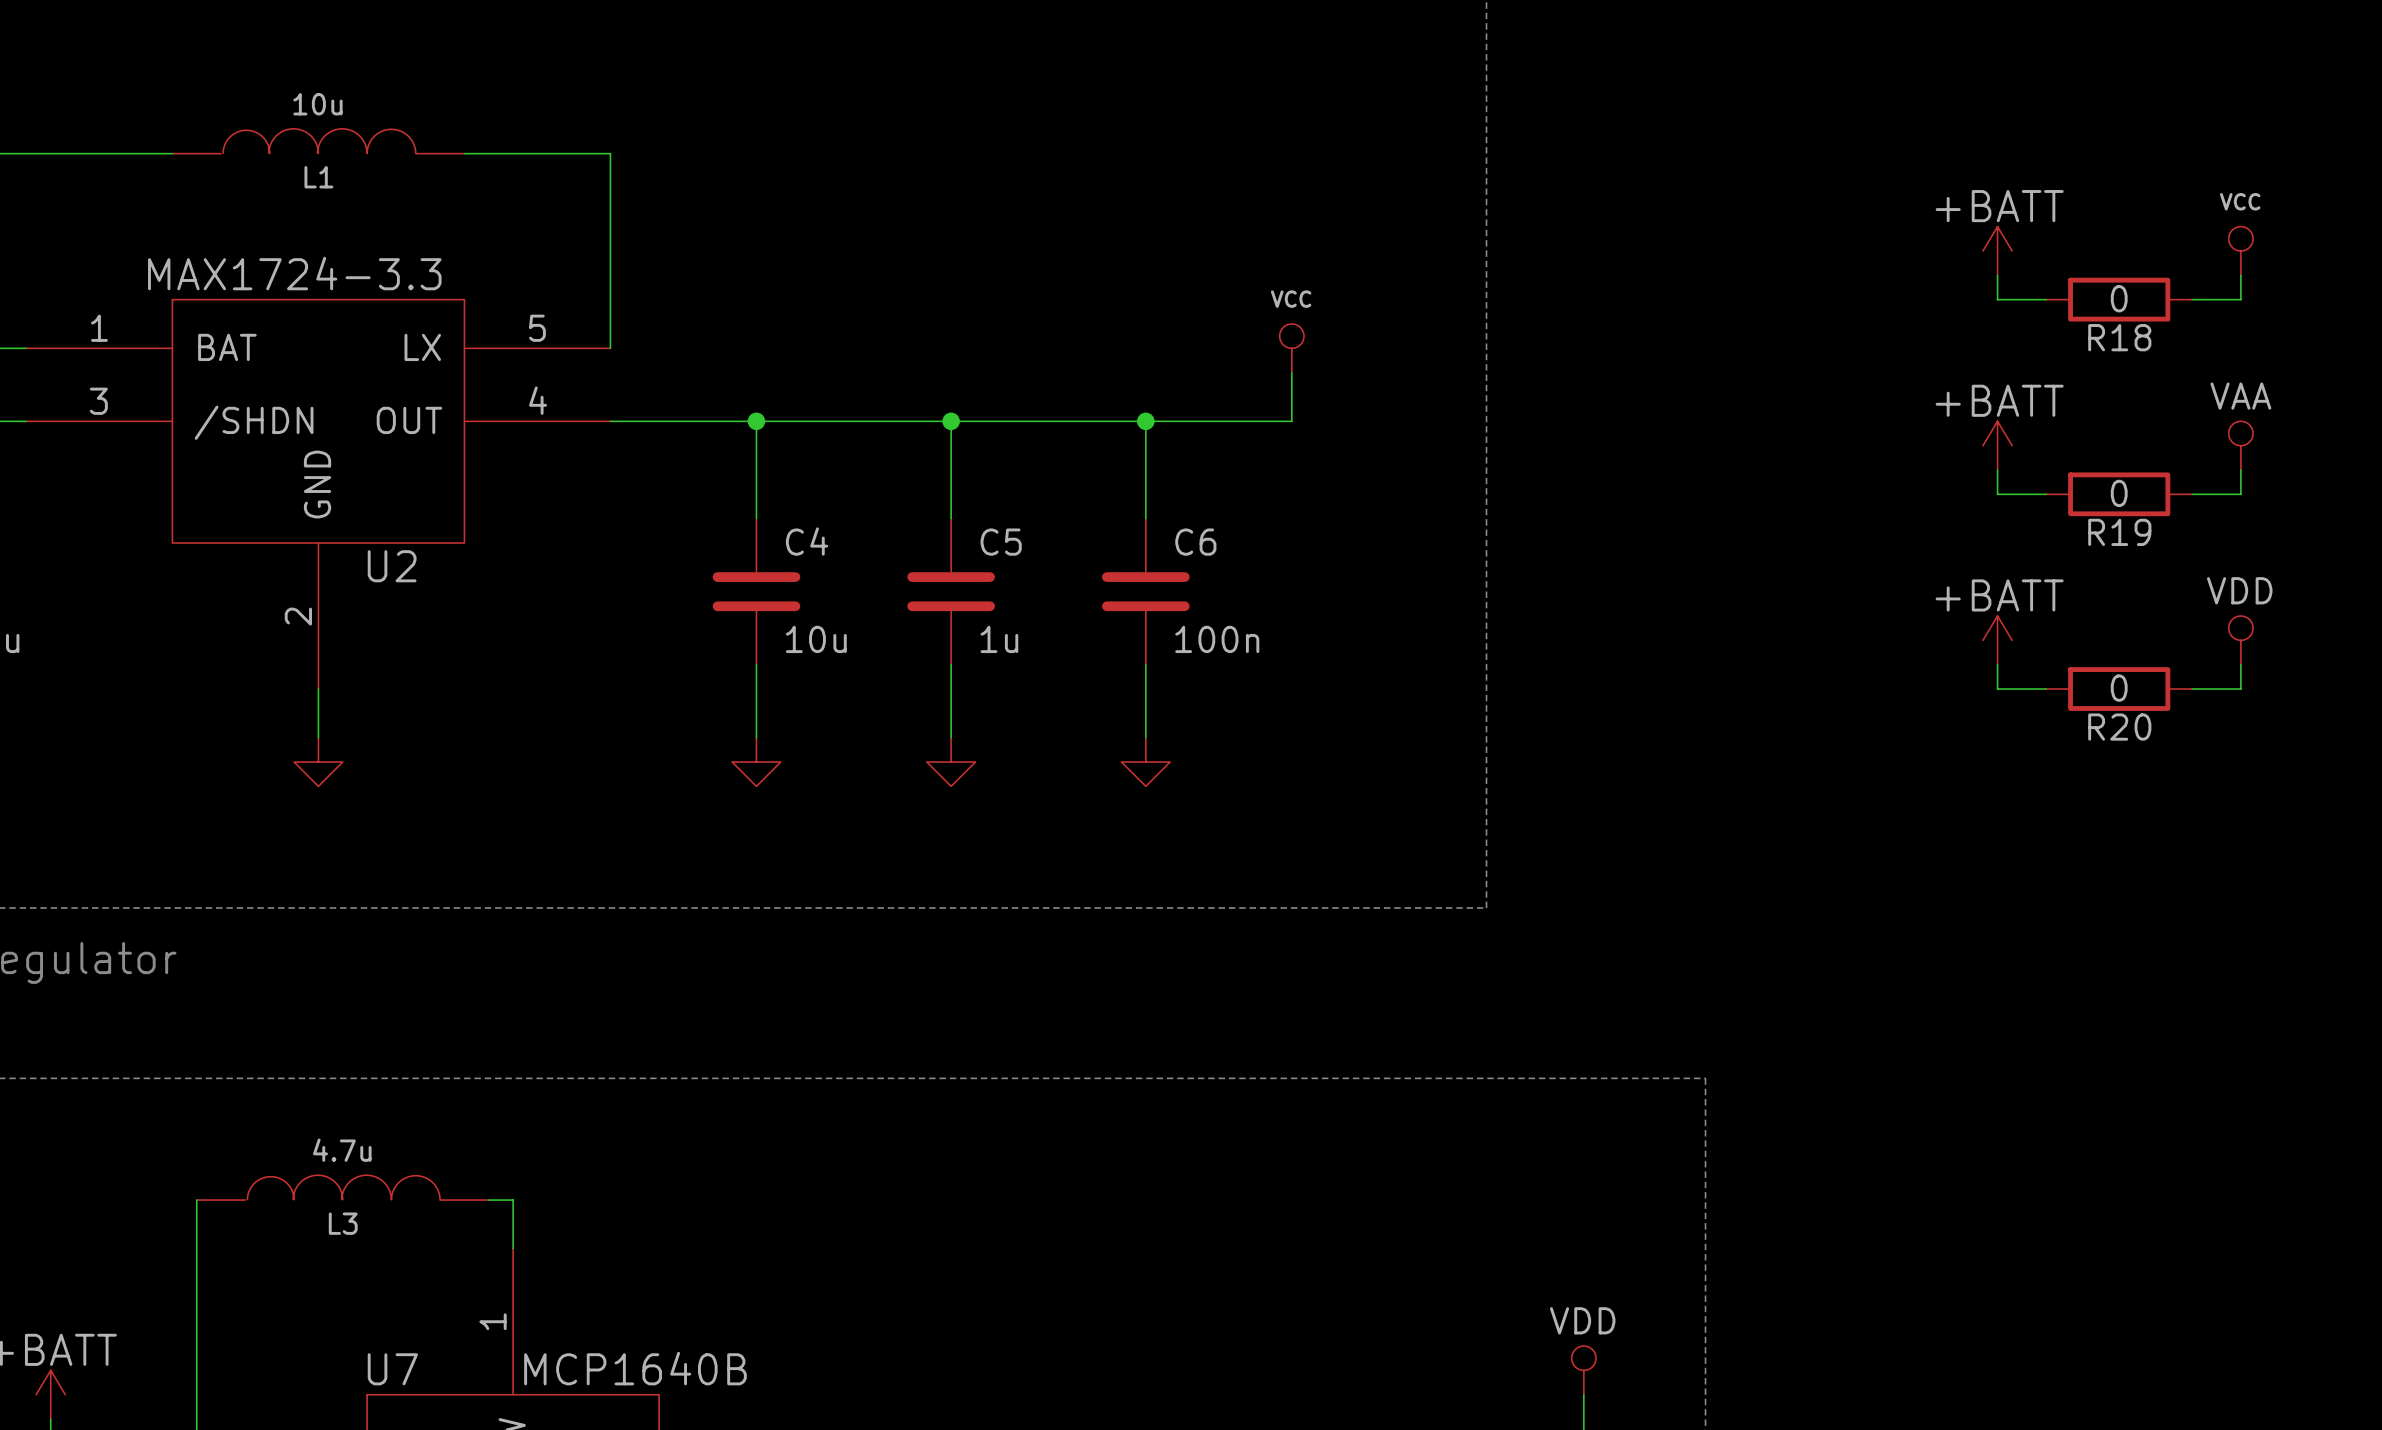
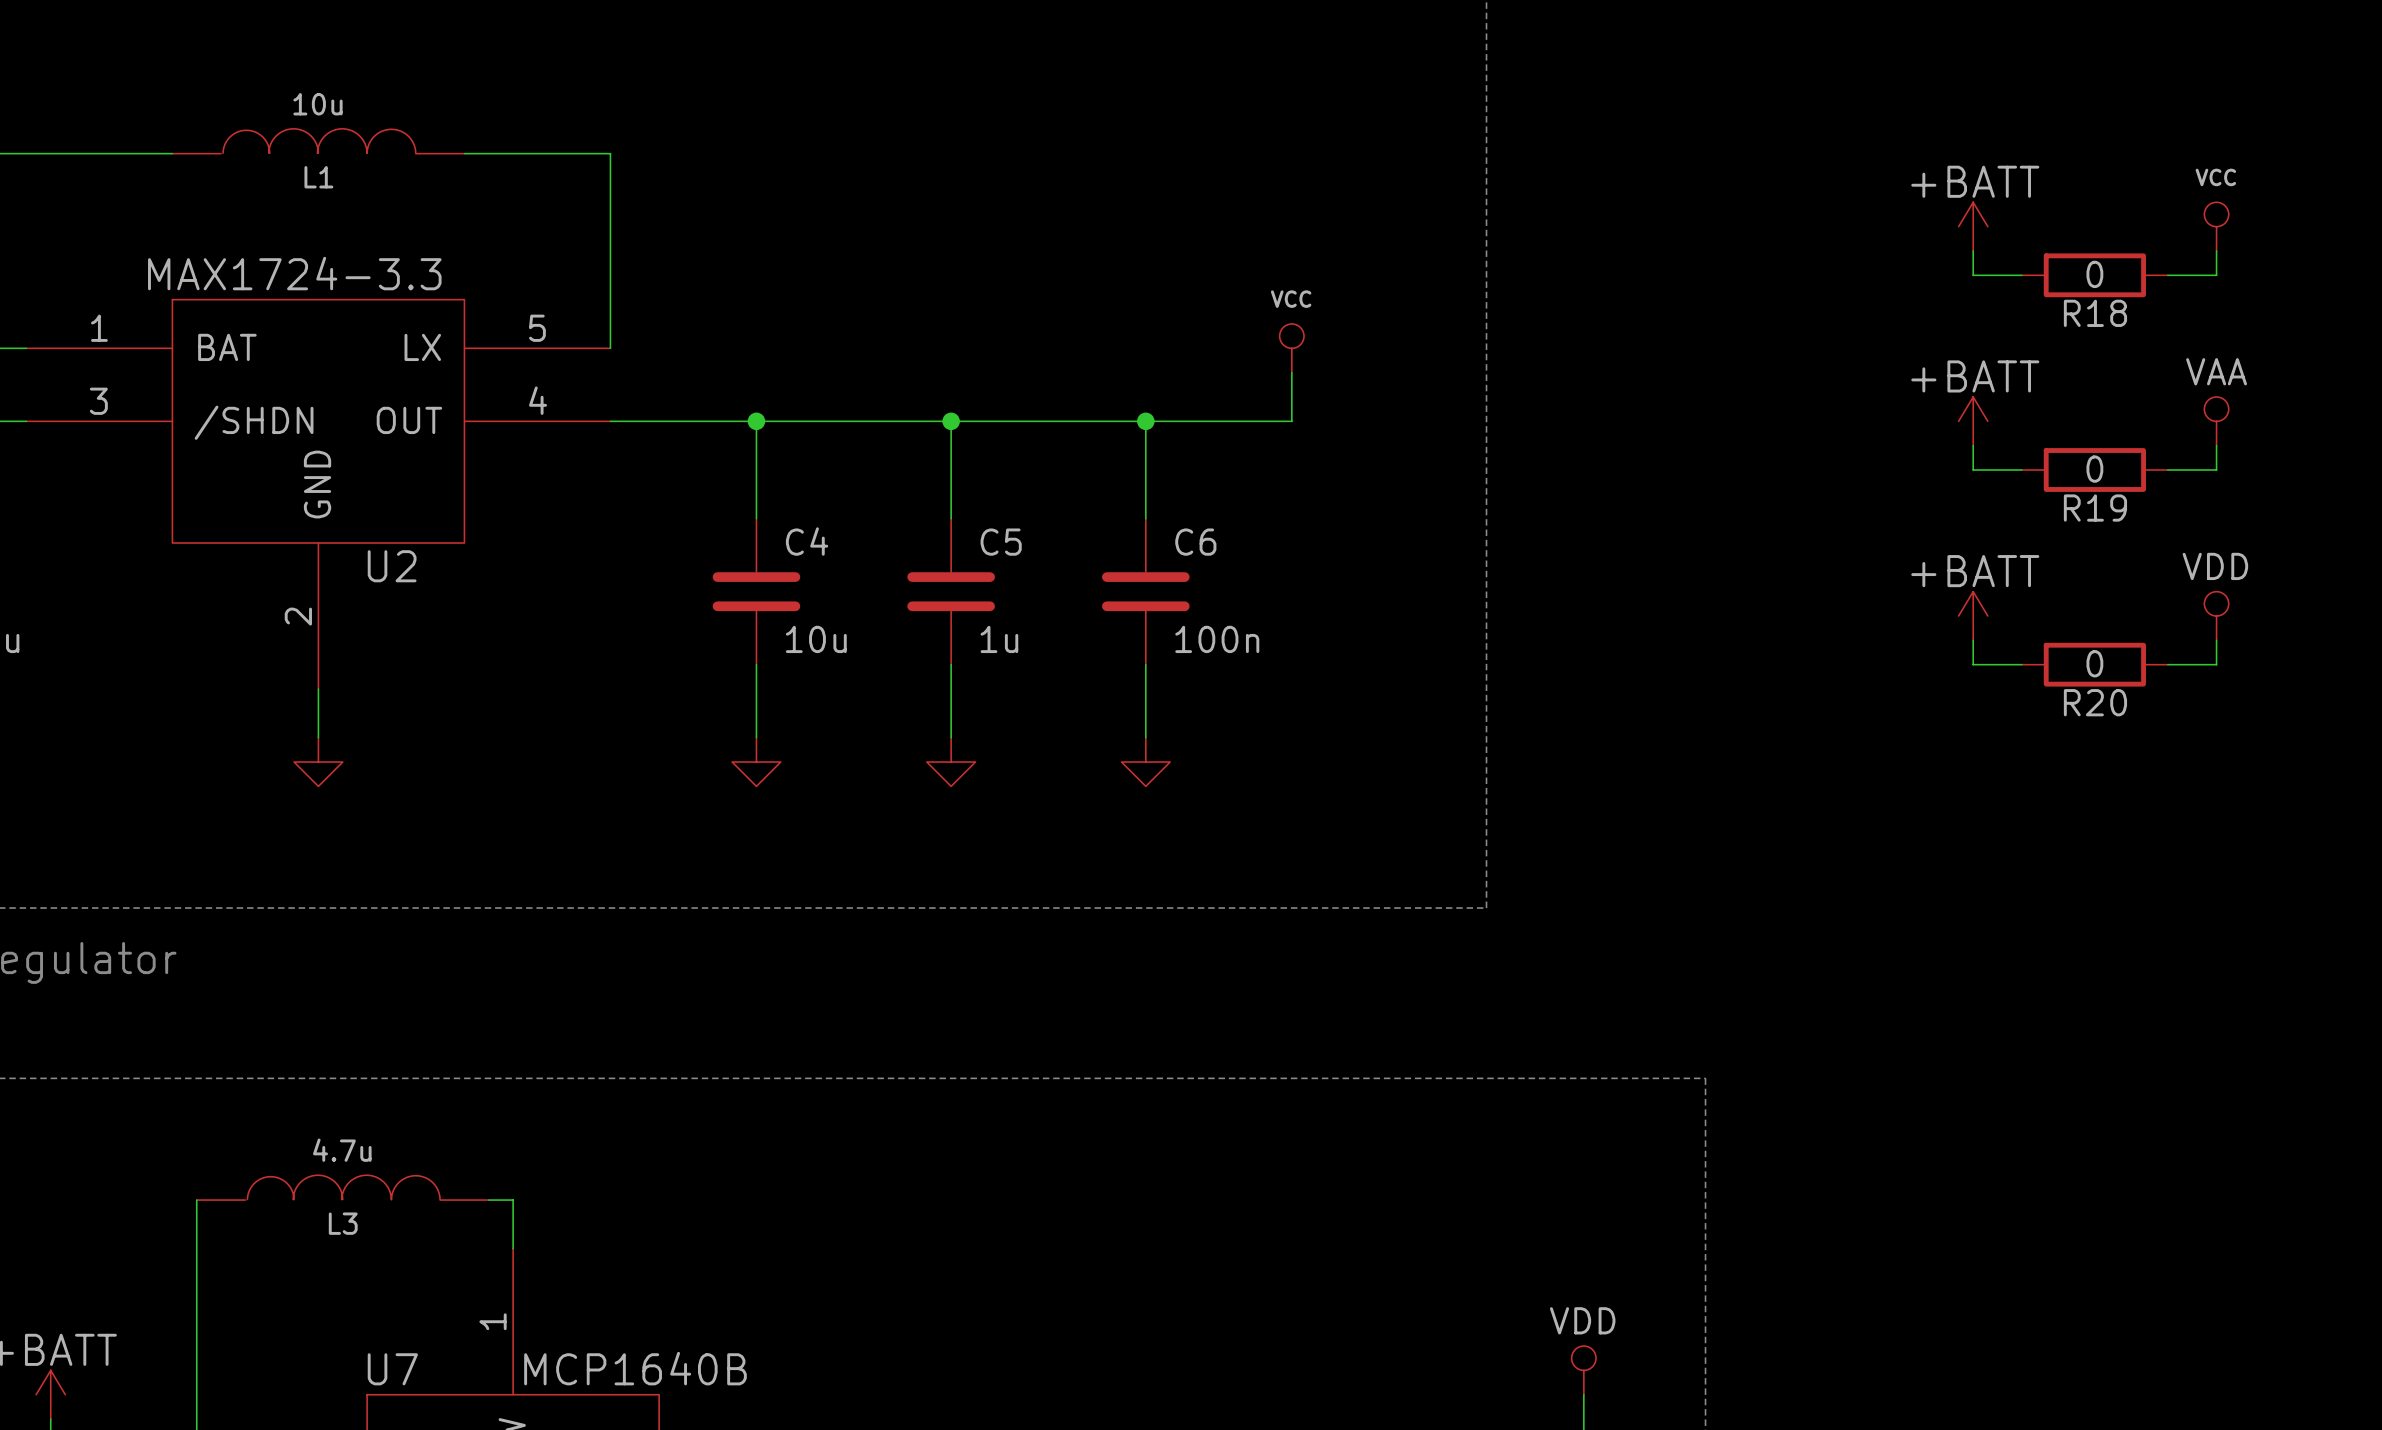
power symbol position: +BATT (1997, 250) -> +BATT (1973, 226)
power symbol position: VCC (2240, 250) -> VCC (2216, 226)
wire: (1997, 275) (1997, 299) (2046, 299) -> (1973, 250) (1973, 275) (2021, 275)
wire: (2240, 275) (2240, 299) (2192, 299) -> (2216, 250) (2216, 275) (2167, 275)
R18 position: (2119, 299) -> (2094, 275)
power symbol position: +BATT (1997, 445) -> +BATT (1973, 421)
power symbol position: VAA (2240, 445) -> VAA (2216, 421)
wire: (1997, 470) (1997, 494) (2046, 494) -> (1973, 445) (1973, 470) (2021, 470)
wire: (2240, 470) (2240, 494) (2192, 494) -> (2216, 445) (2216, 470) (2167, 470)
R19 position: (2119, 494) -> (2094, 470)
power symbol position: +BATT (1997, 640) -> +BATT (1973, 616)
power symbol position: VDD (2240, 640) -> VDD (2216, 616)
wire: (1997, 664) (1997, 689) (2046, 689) -> (1973, 640) (1973, 664) (2021, 664)
wire: (2240, 664) (2240, 689) (2192, 689) -> (2216, 640) (2216, 664) (2167, 664)
R20 position: (2119, 689) -> (2094, 664)

